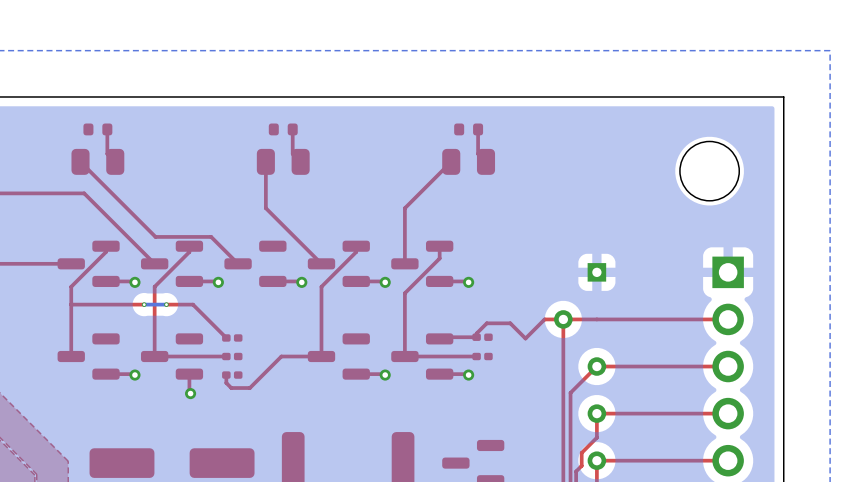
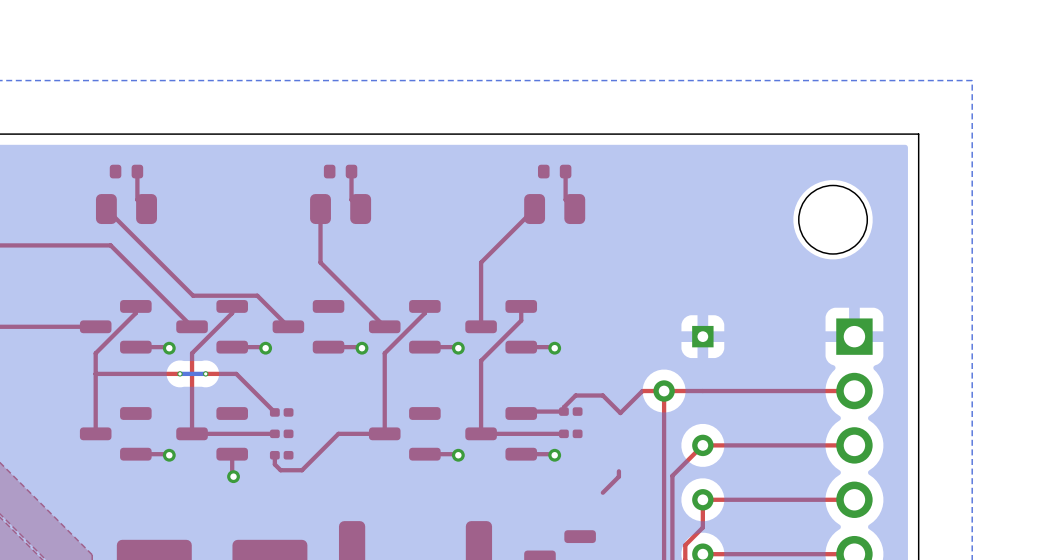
top track: none -> (618, 471) (618, 476) (602, 492)

